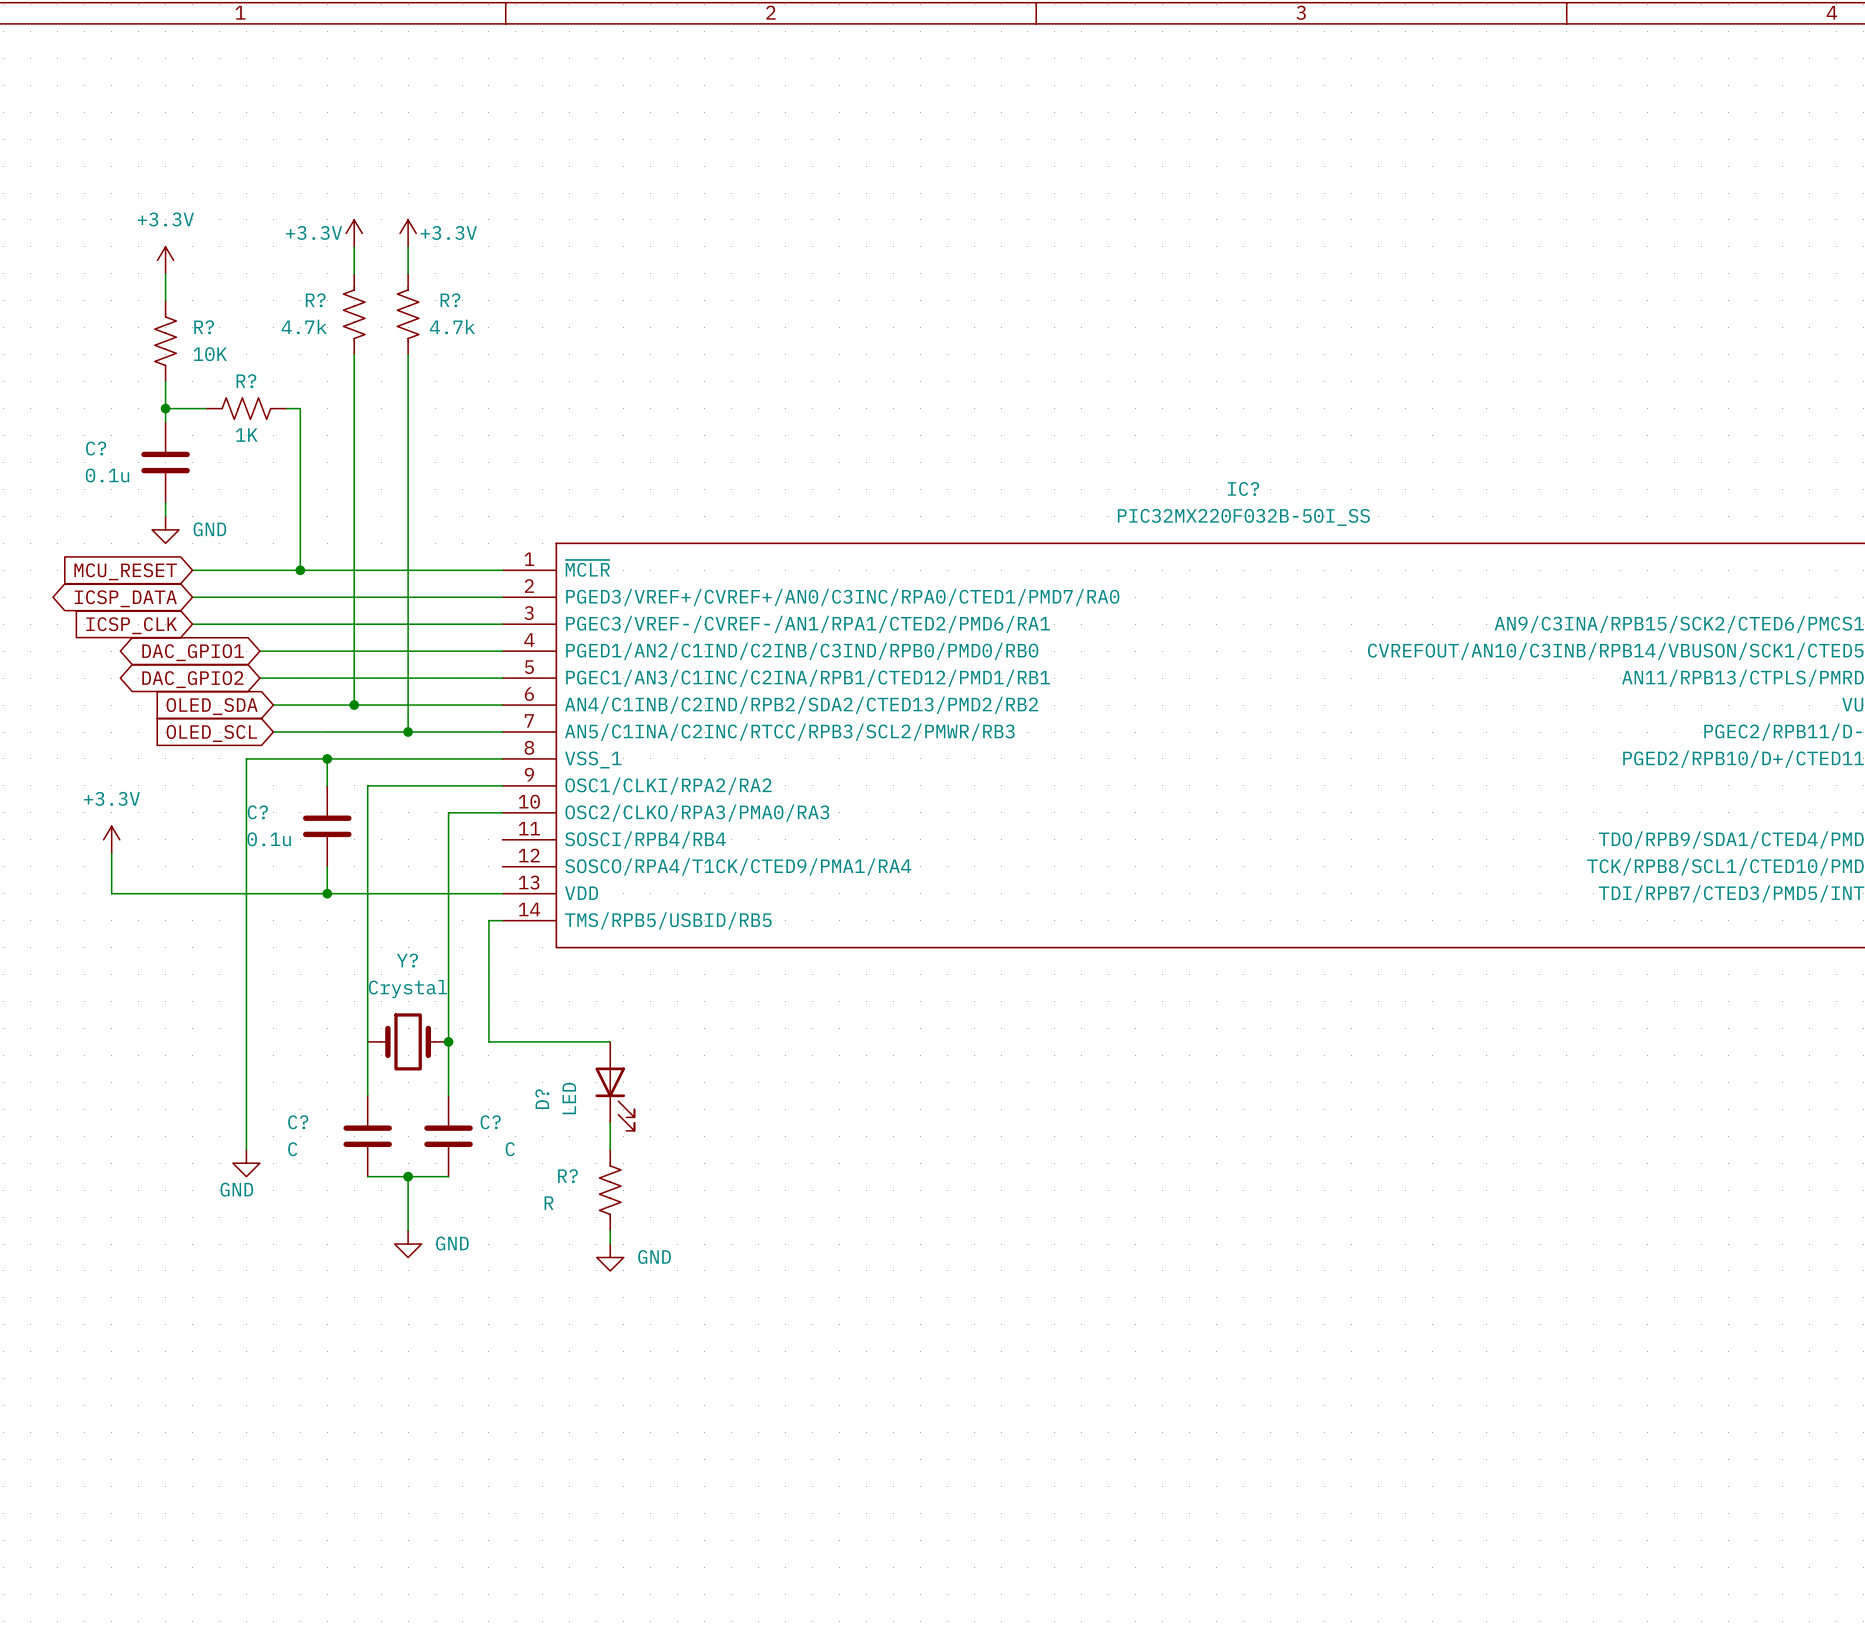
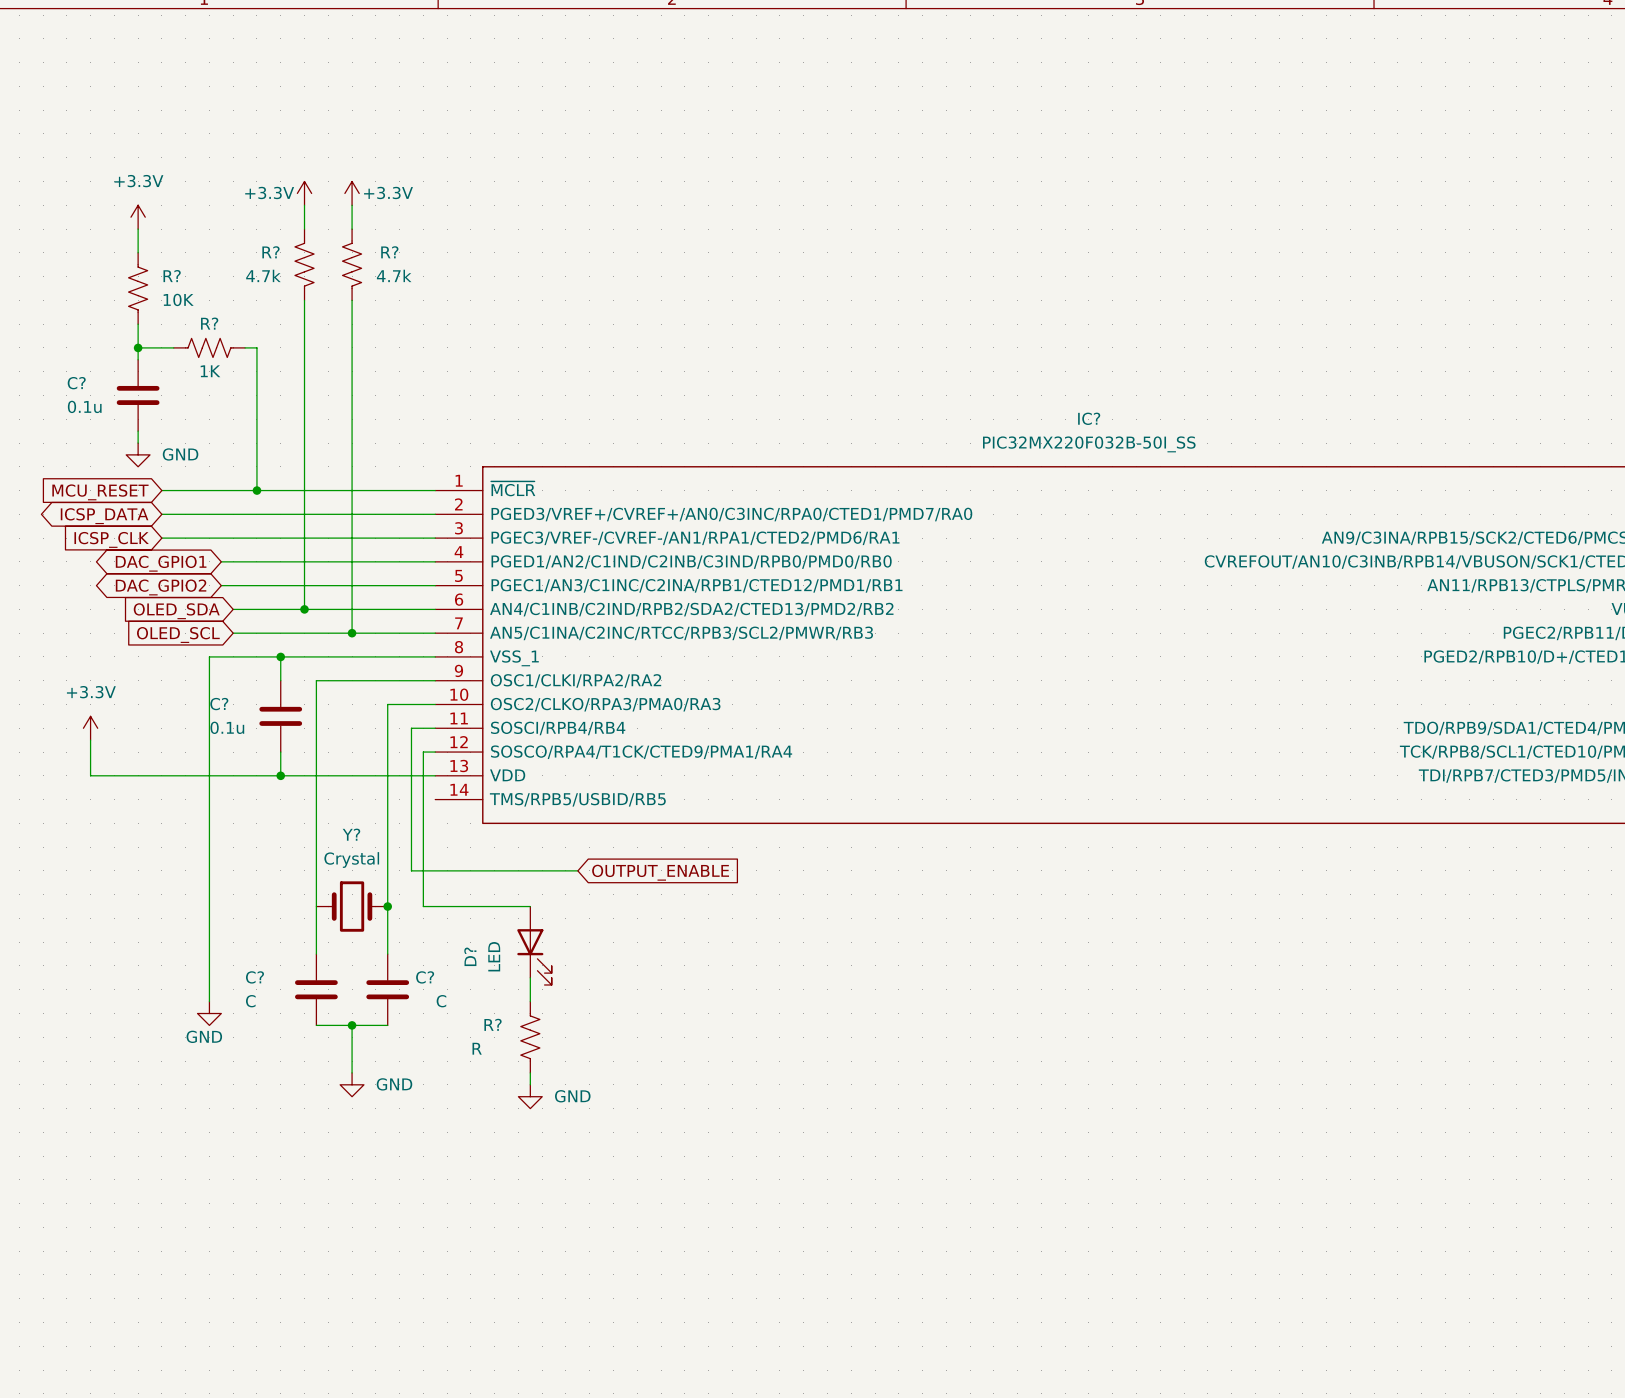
wire: none -> (435, 728) (411, 728) (411, 870) (577, 870)
wire: (488, 920) (502, 920) -> (423, 799) (423, 752) (435, 752)
global label: none -> OUTPUT_ENABLE (660, 872)

